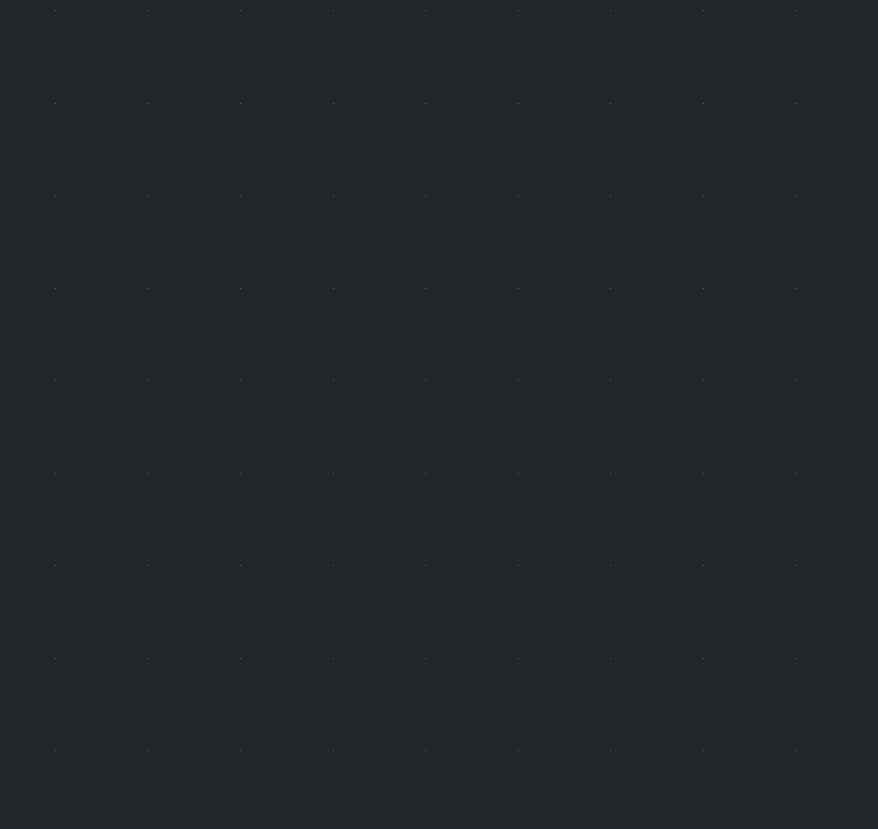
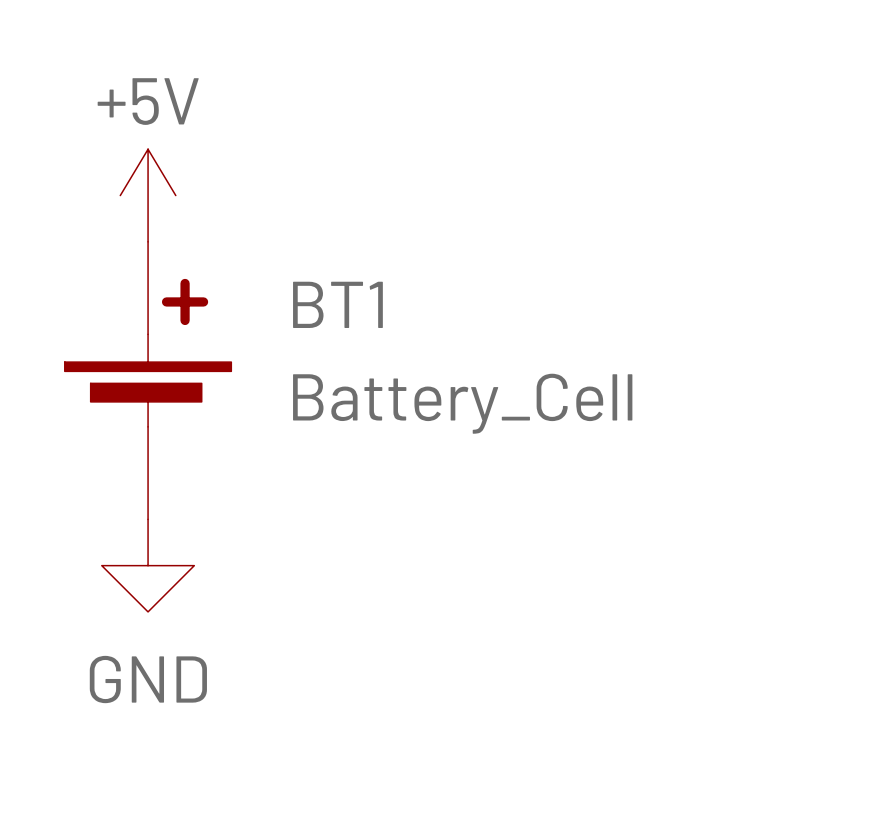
power symbol: none -> +5V (148, 195)
BT1: none -> Battery_Cell (148, 380)
power symbol: none -> GND (148, 565)

